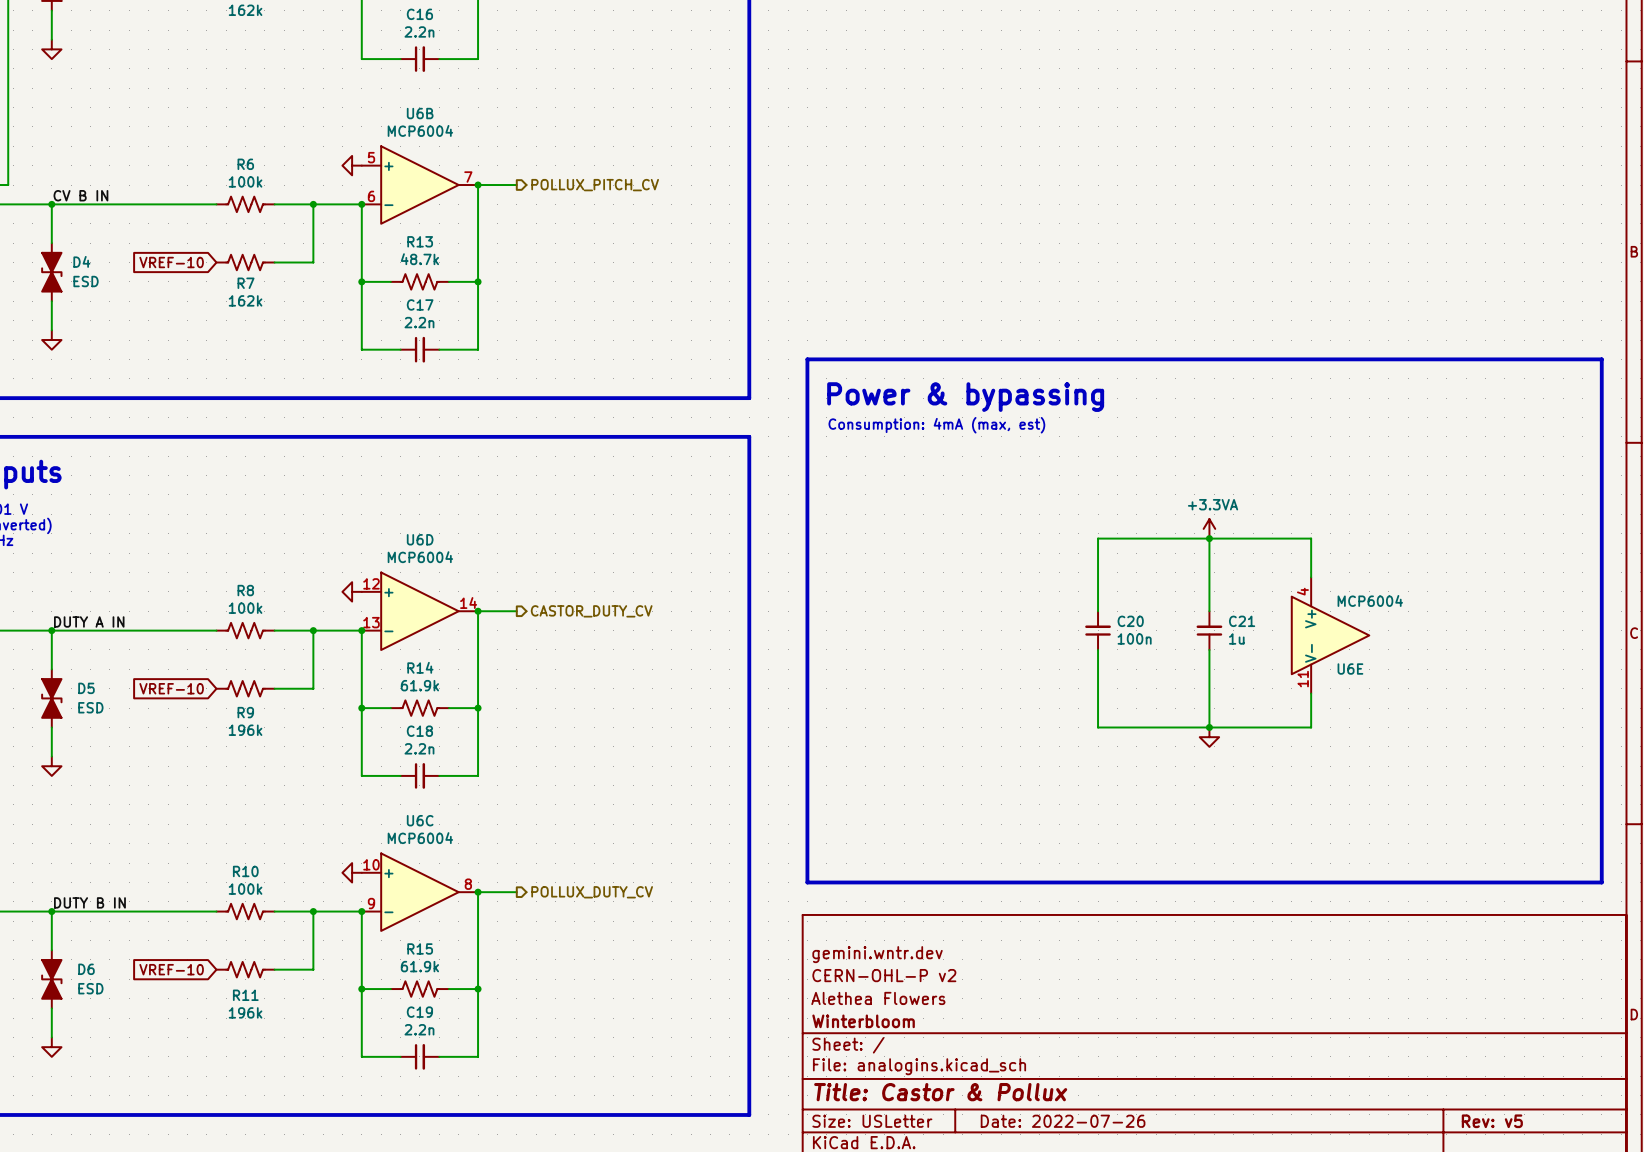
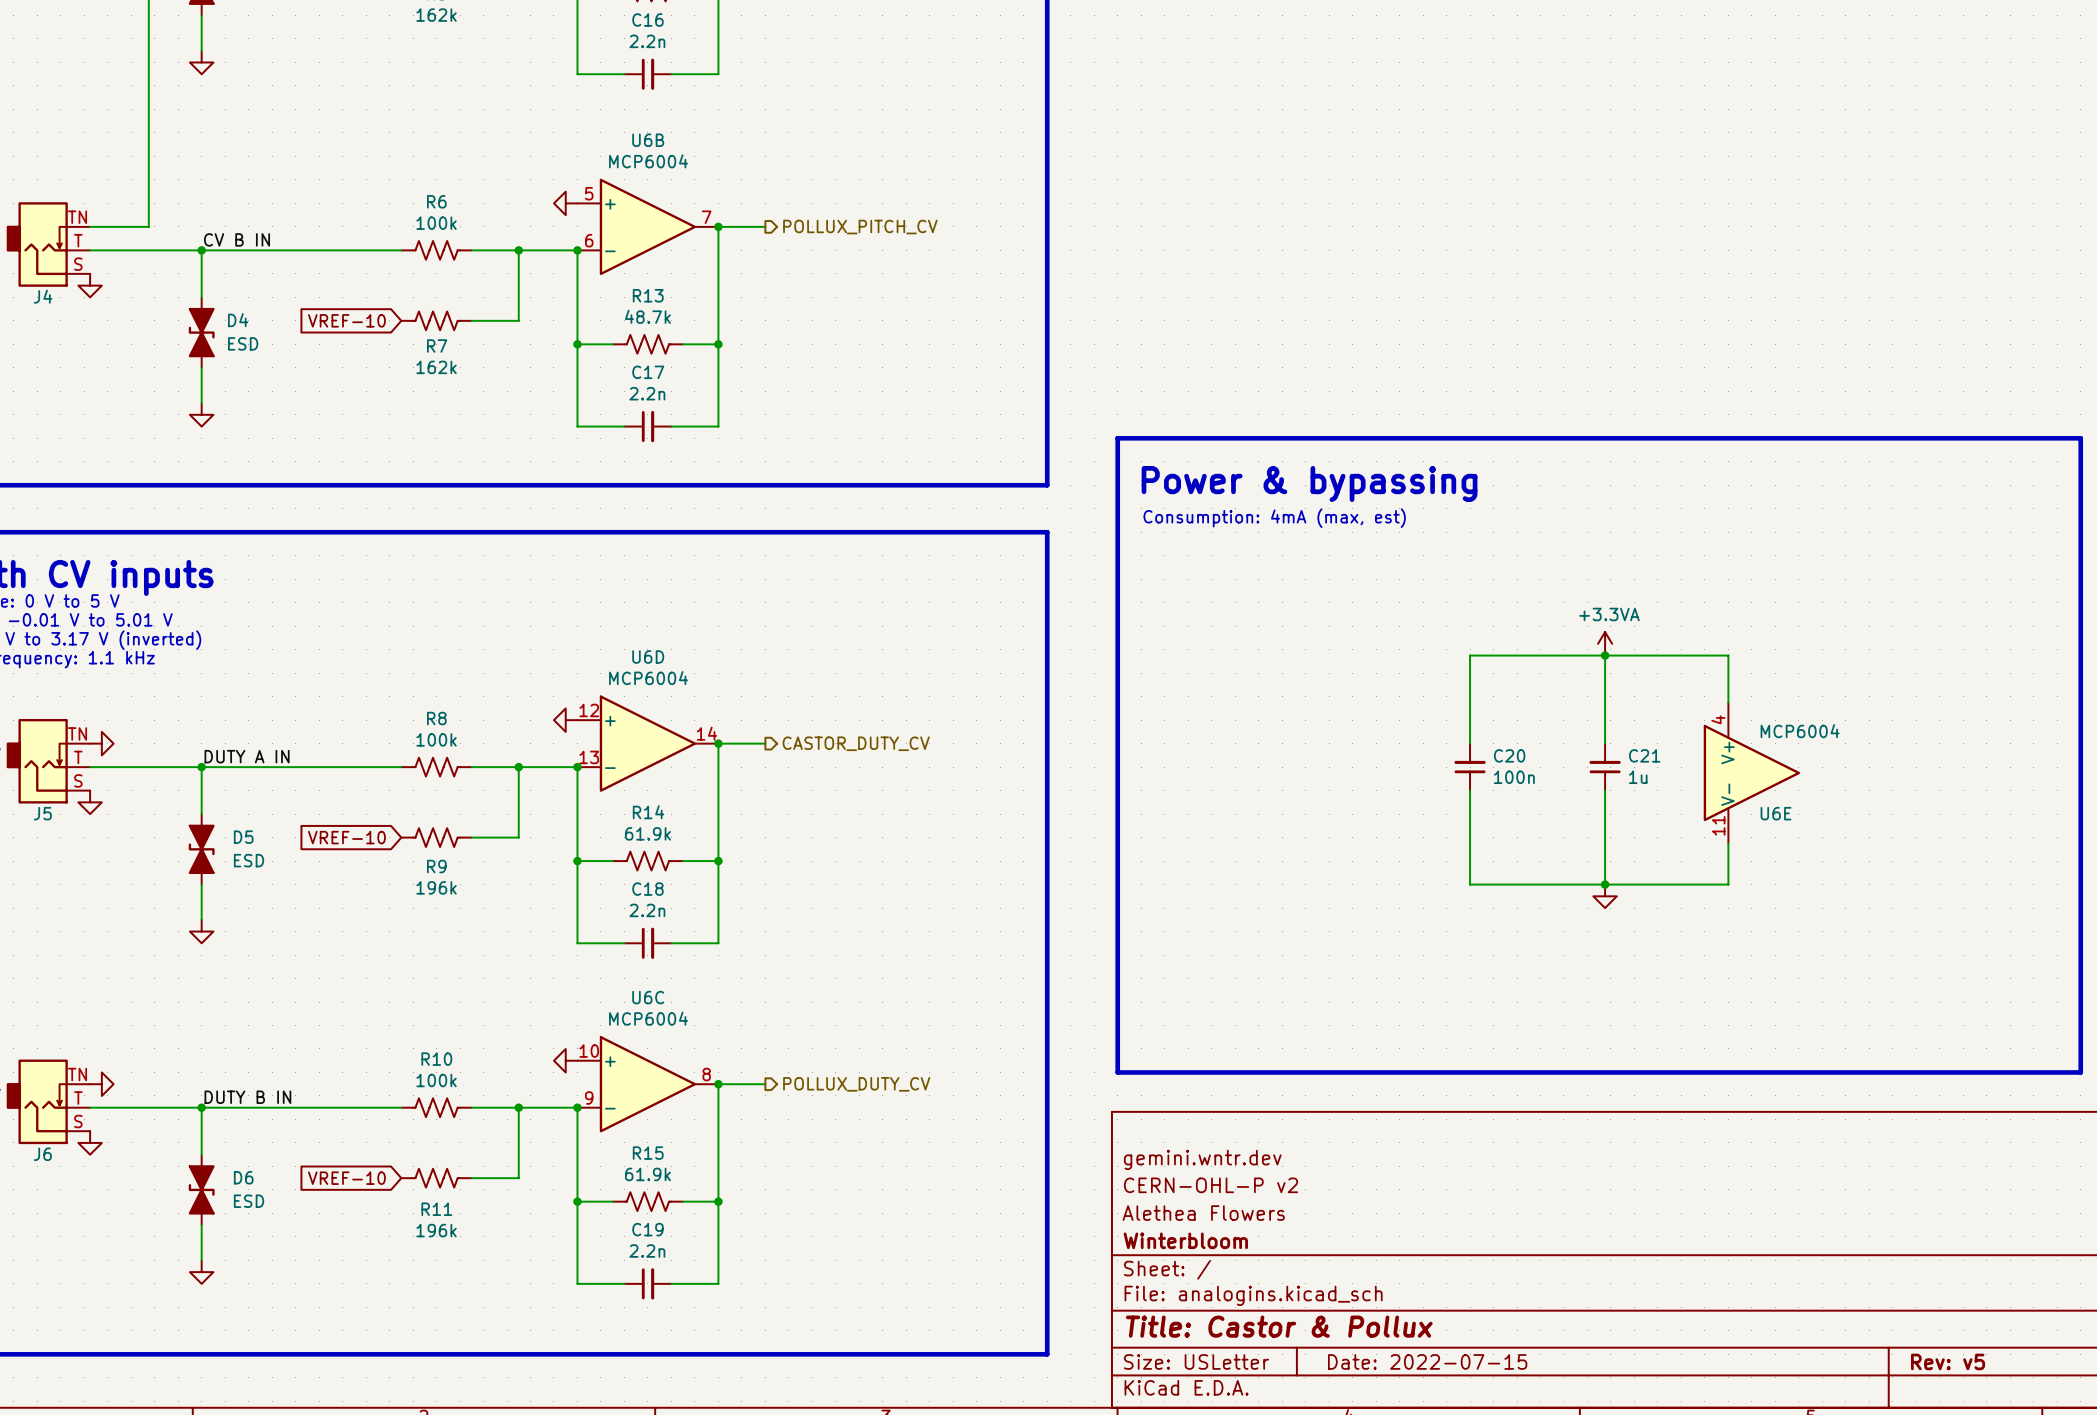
title block: Date: 2022-07-26 (1063, 1121) -> Date: 2022-07-15 (1427, 1361)

